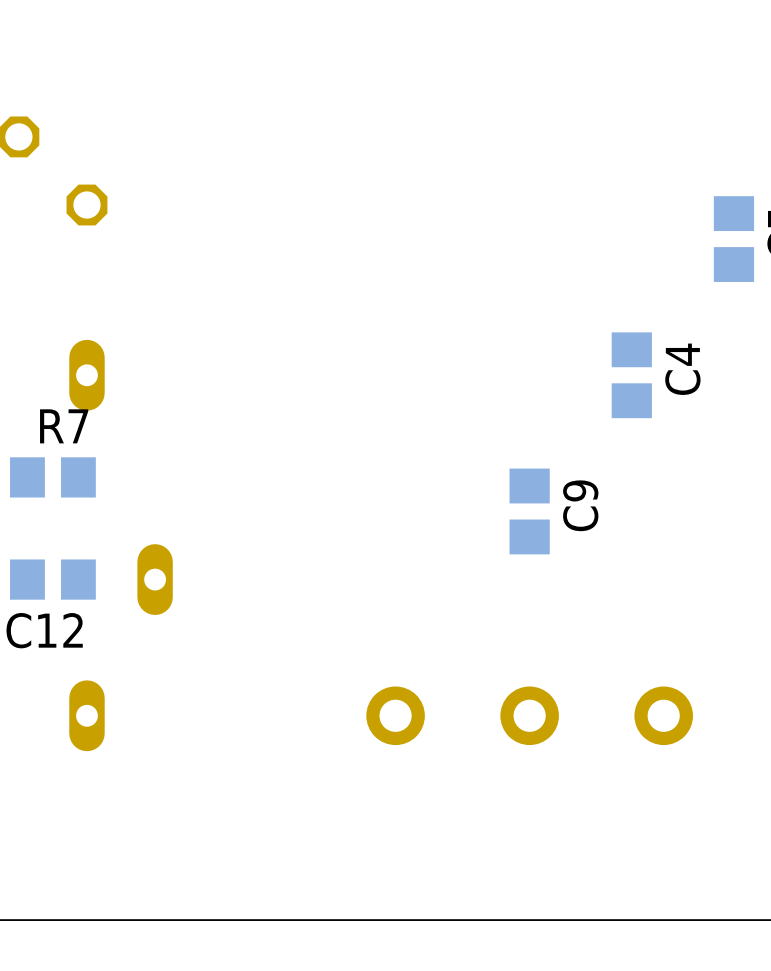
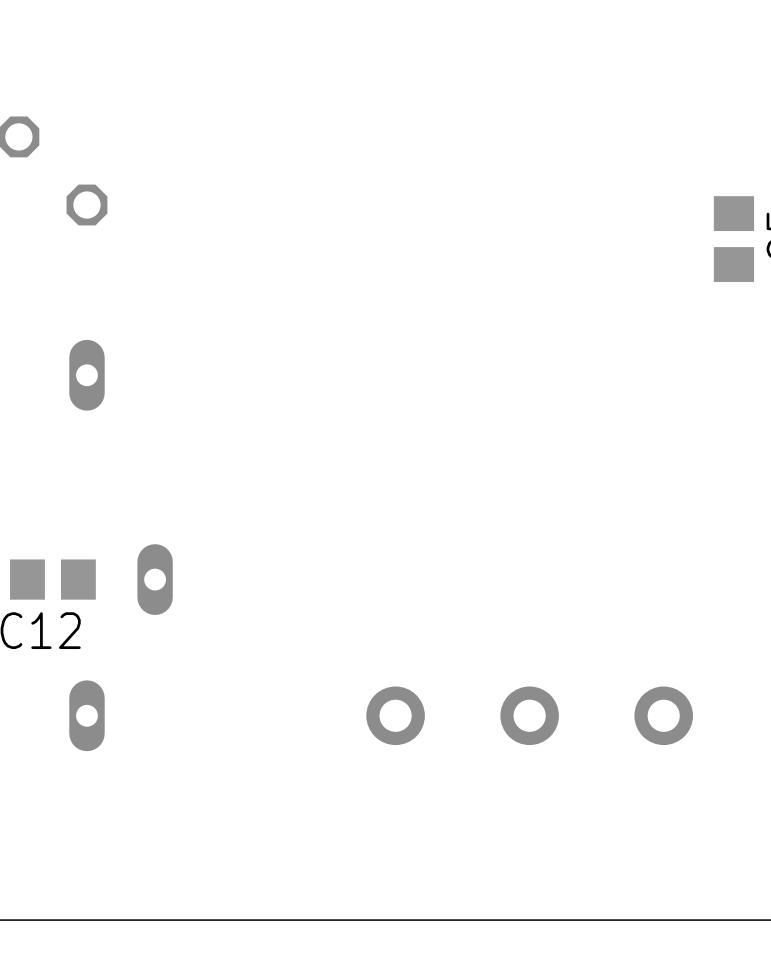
C4: (631, 375) -> none
R7: (52, 477) -> none
C9: (529, 511) -> none

